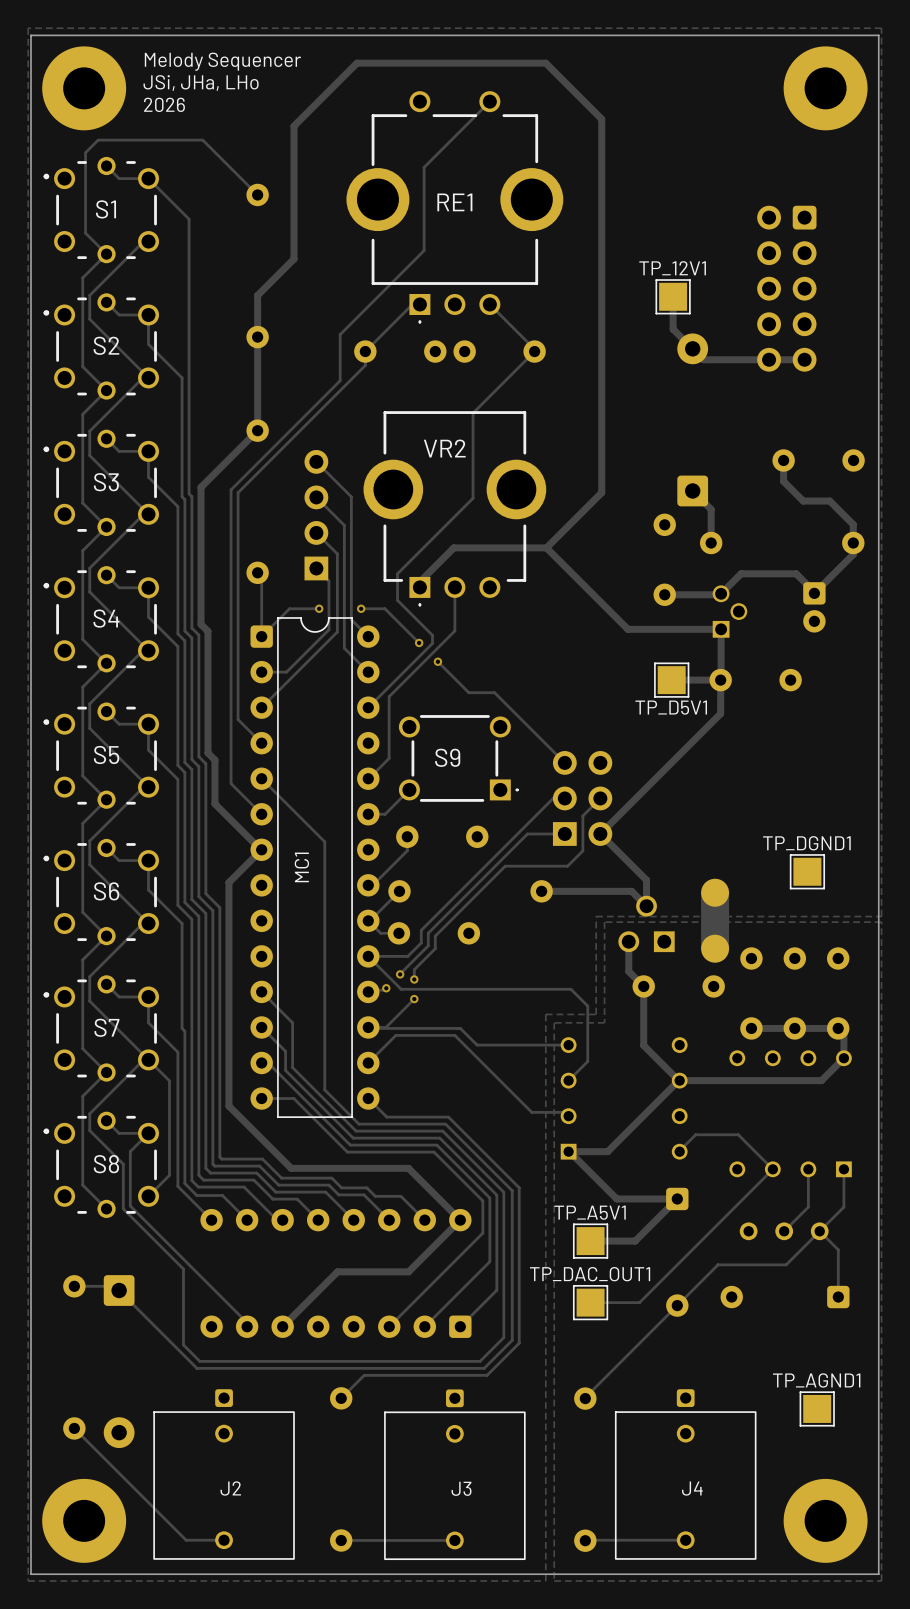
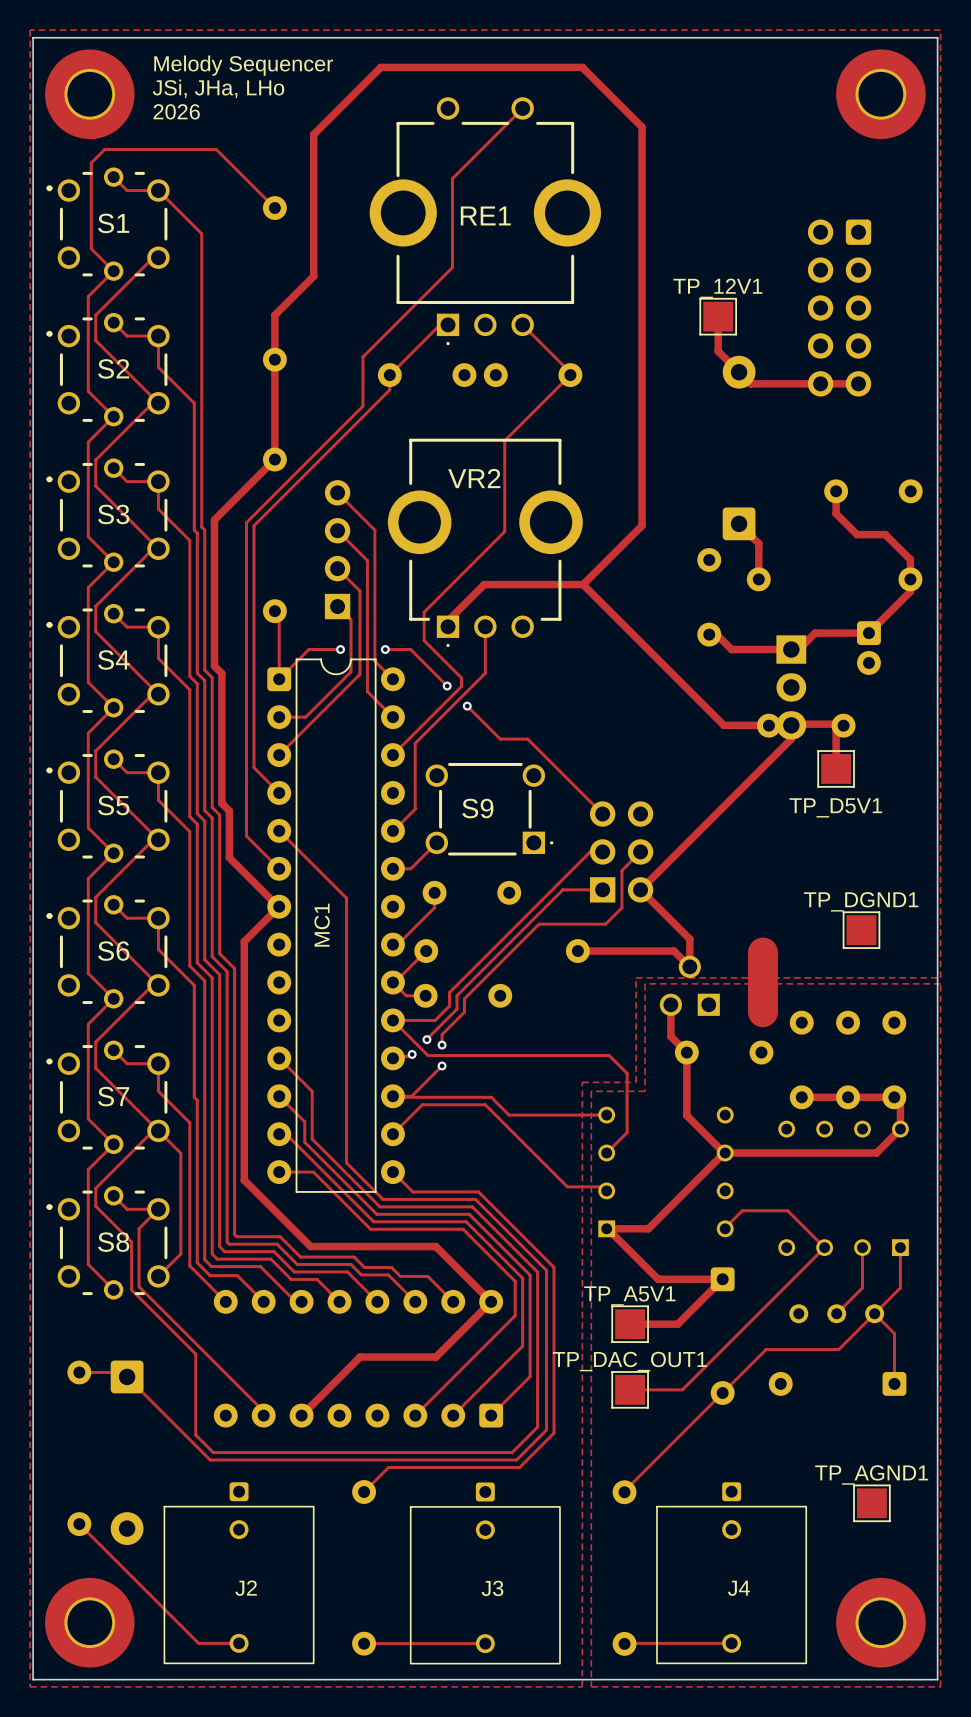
track: (814, 591) (796, 573) (741, 573) (721, 593) -> none
track: (671, 594) (720, 594) -> (716, 634) (731, 649) (798, 649) (815, 633) (868, 633)
part: (729, 611) -> none
track: (627, 629) (721, 629) (721, 679) -> (669, 671) (723, 725) (791, 725)
part: none -> (791, 687)
track: none -> (791, 725) (836, 724) (836, 768)
track: (671, 680) (720, 680) (720, 713) -> (791, 725) (791, 739) (768, 761)
TP_D5V1 position: (671, 680) -> (836, 768)
TP_D5V1 name position: TP_D5V1 (671, 707) -> TP_D5V1 (835, 807)

